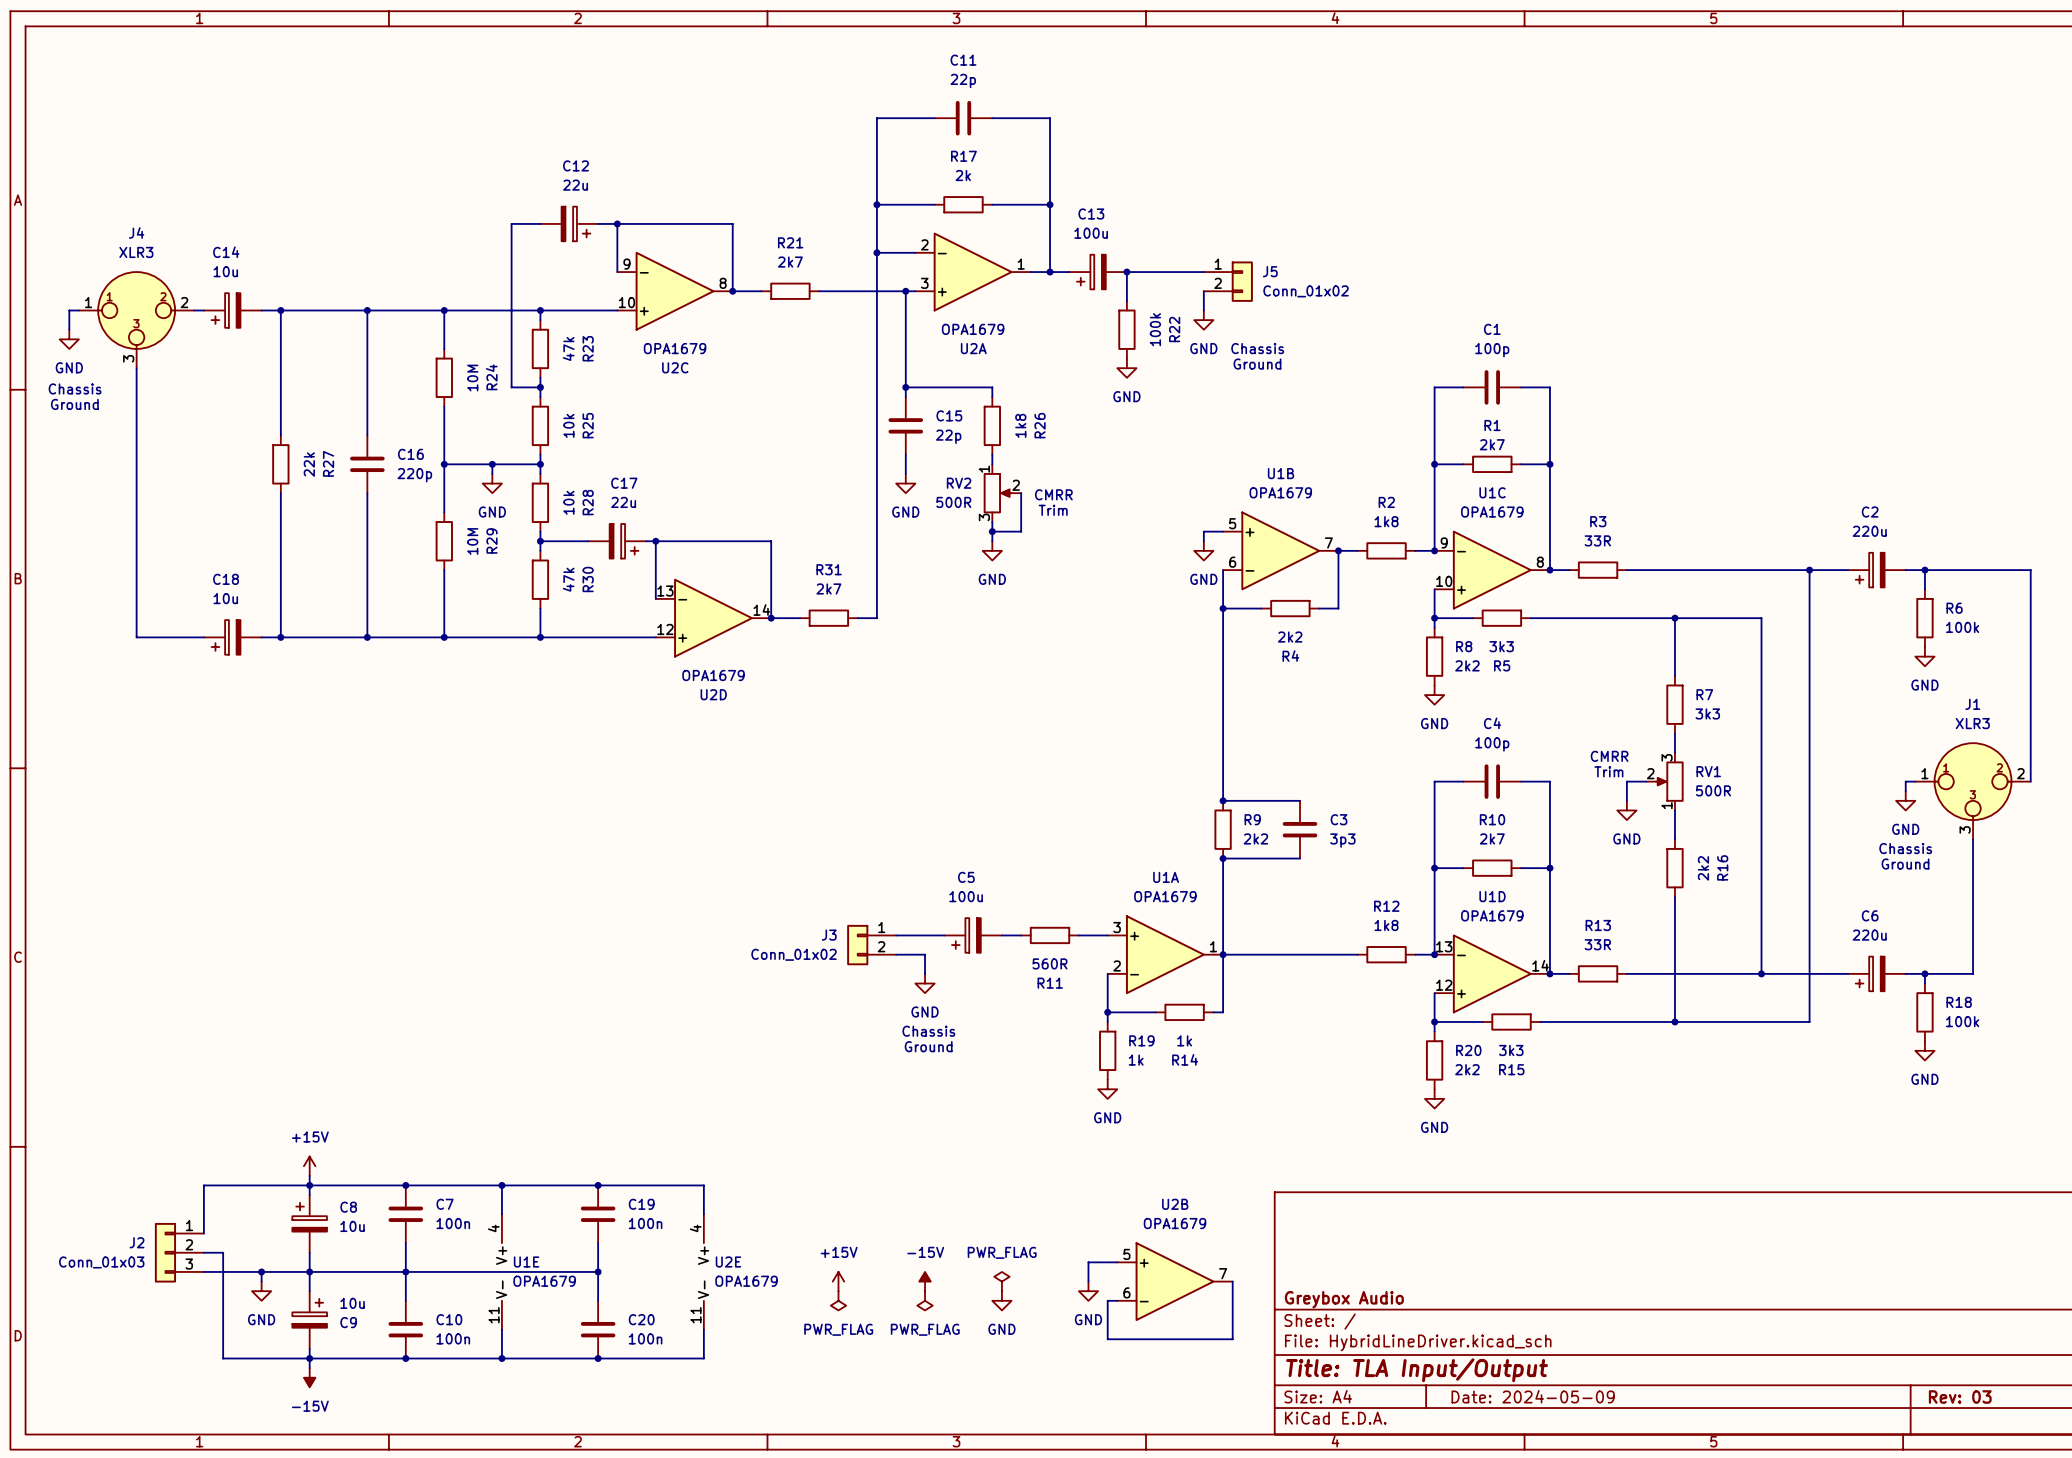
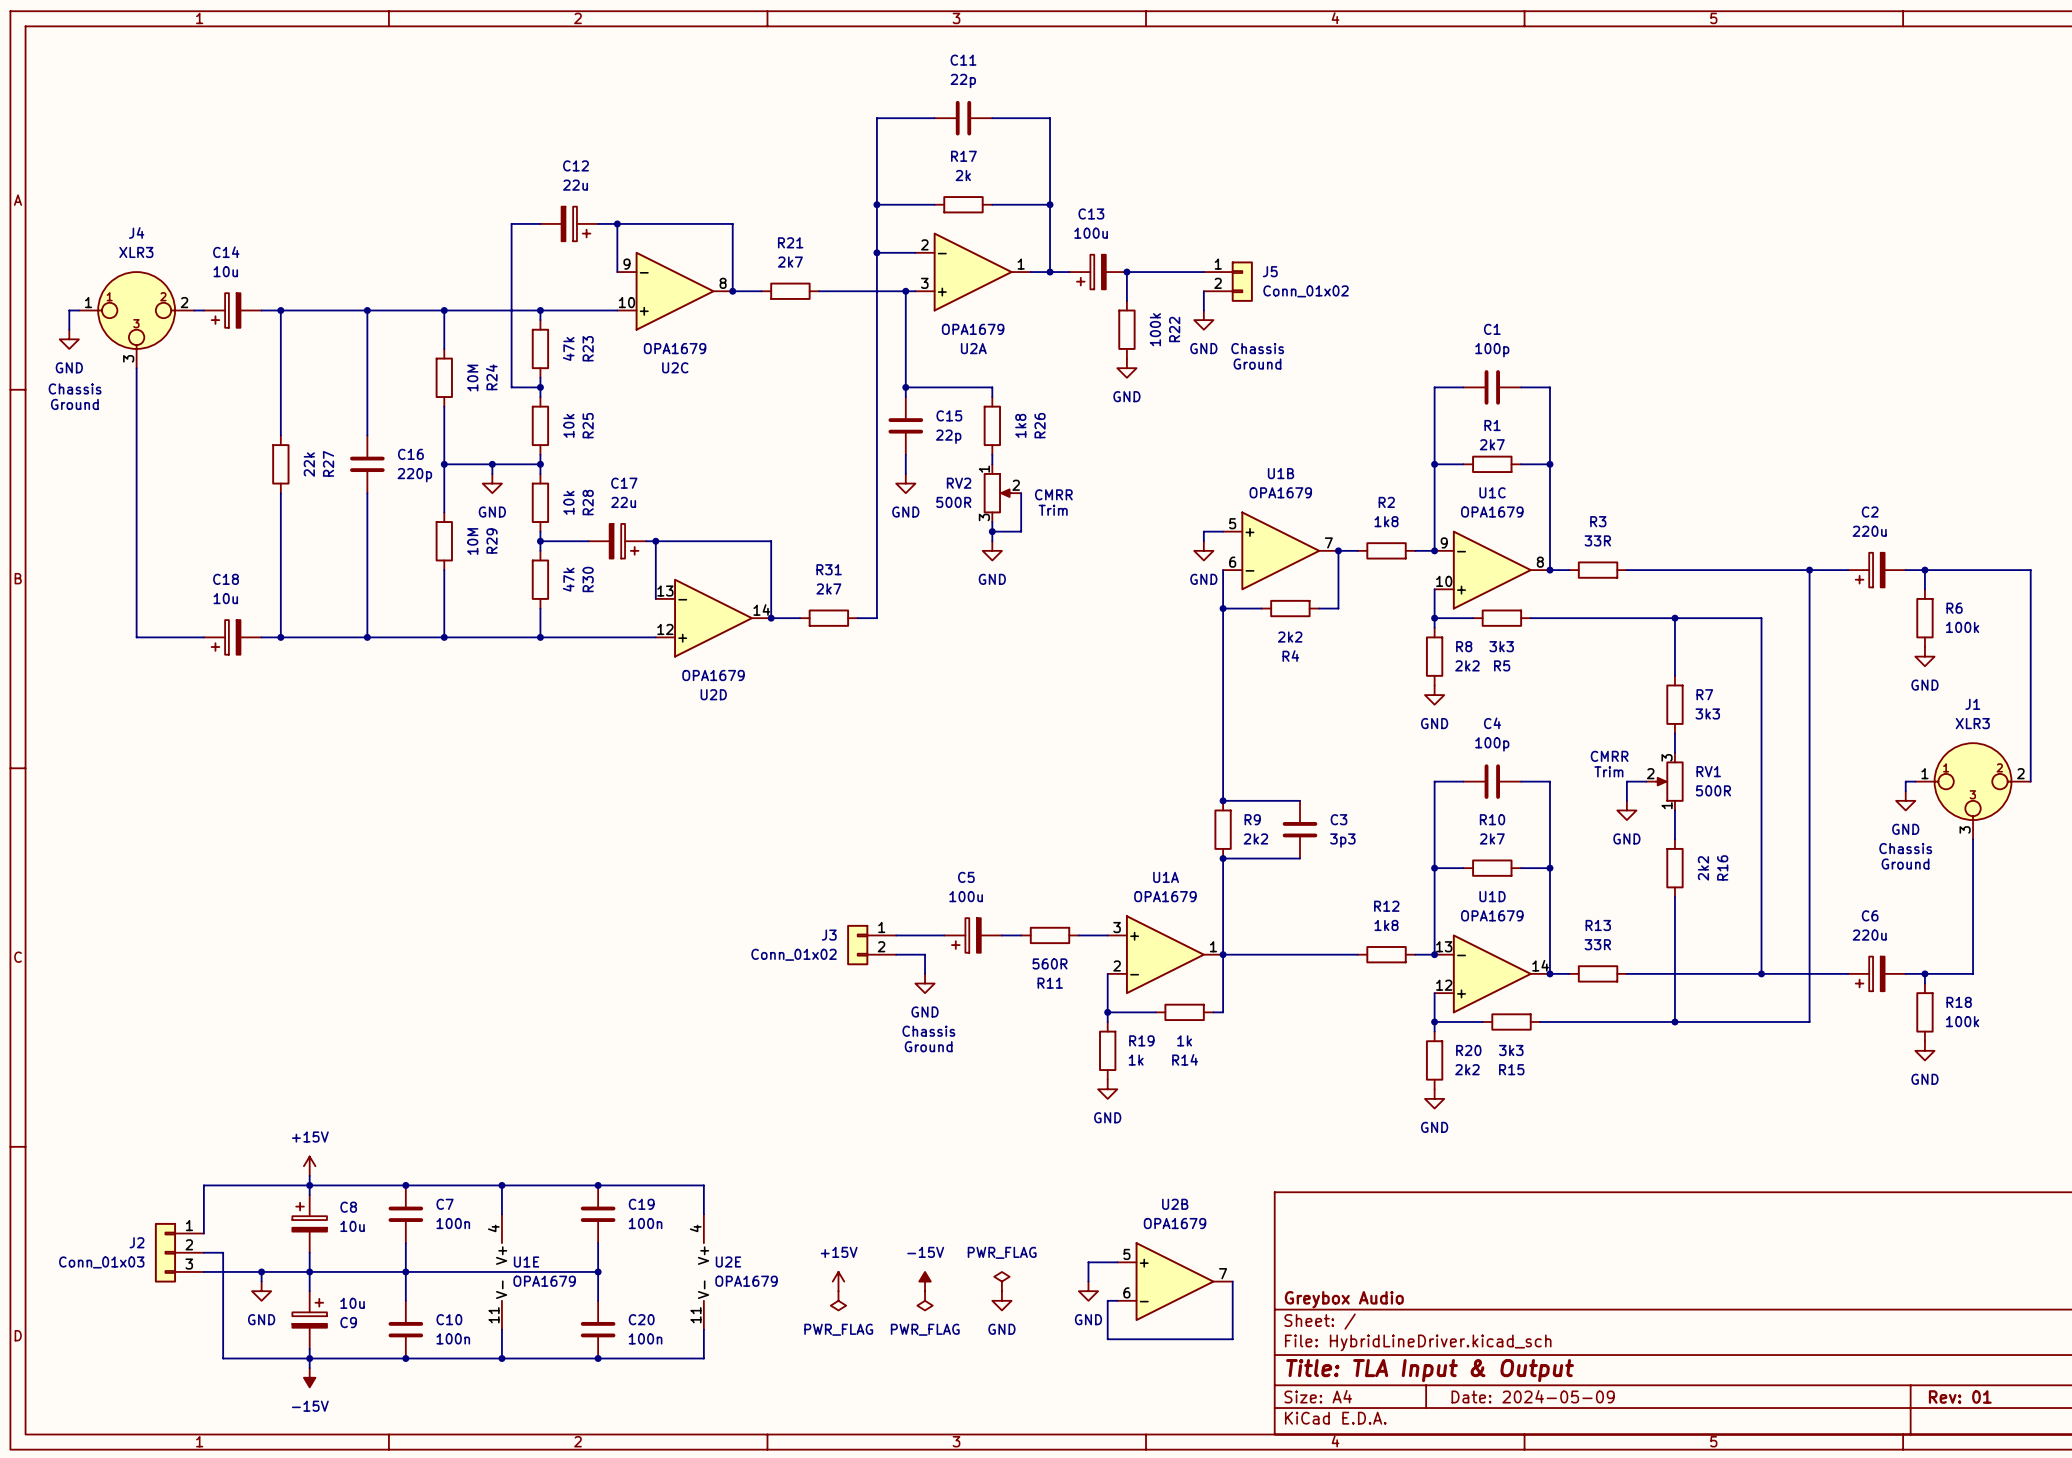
title block: Title: TLA Input/Output (1417, 1370) -> Title: TLA Input & Output (1430, 1370)
title block: Rev: 03 (1960, 1396) -> Rev: 01 (1960, 1396)

